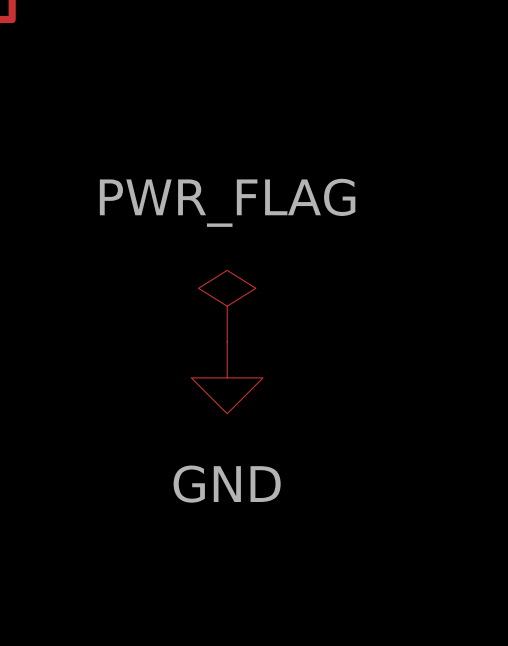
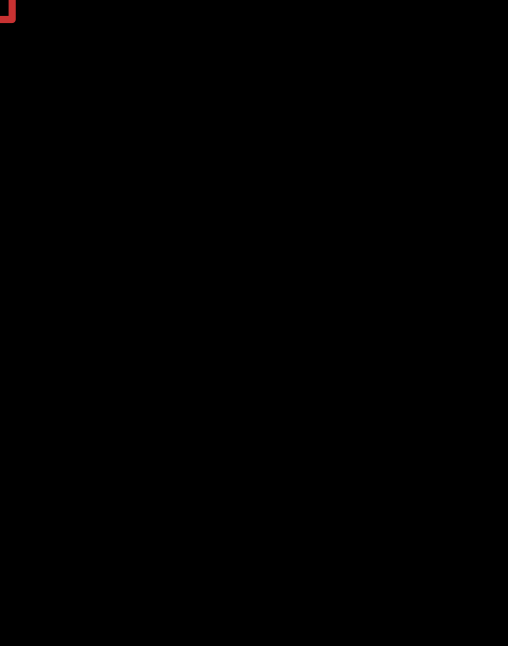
power symbol: PWR_FLAG (227, 306) -> none
power symbol: GND (227, 377) -> none

